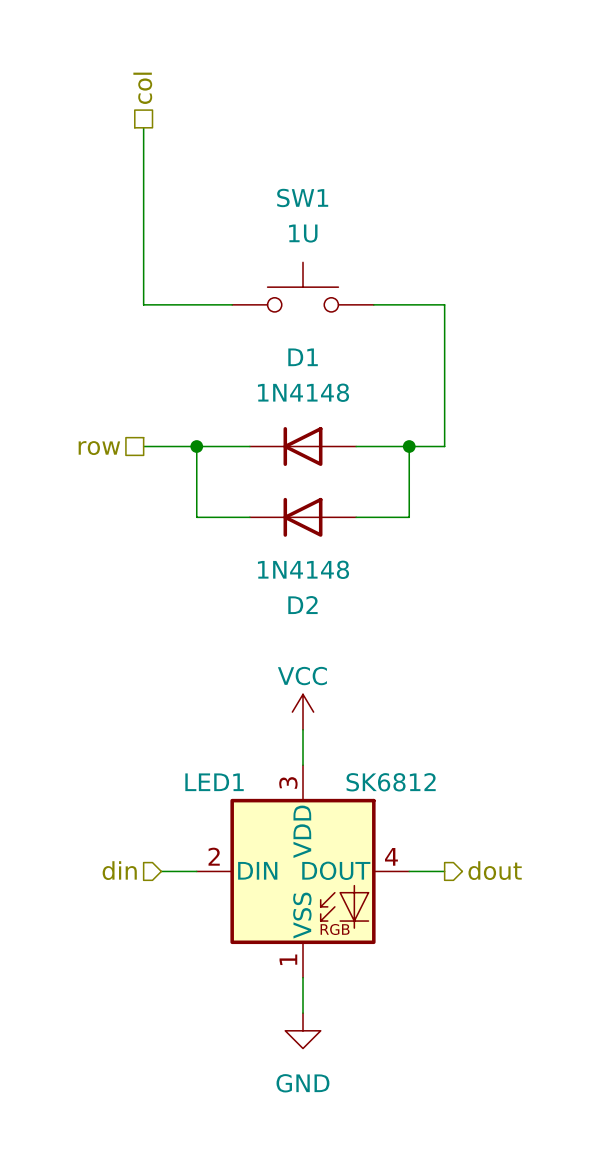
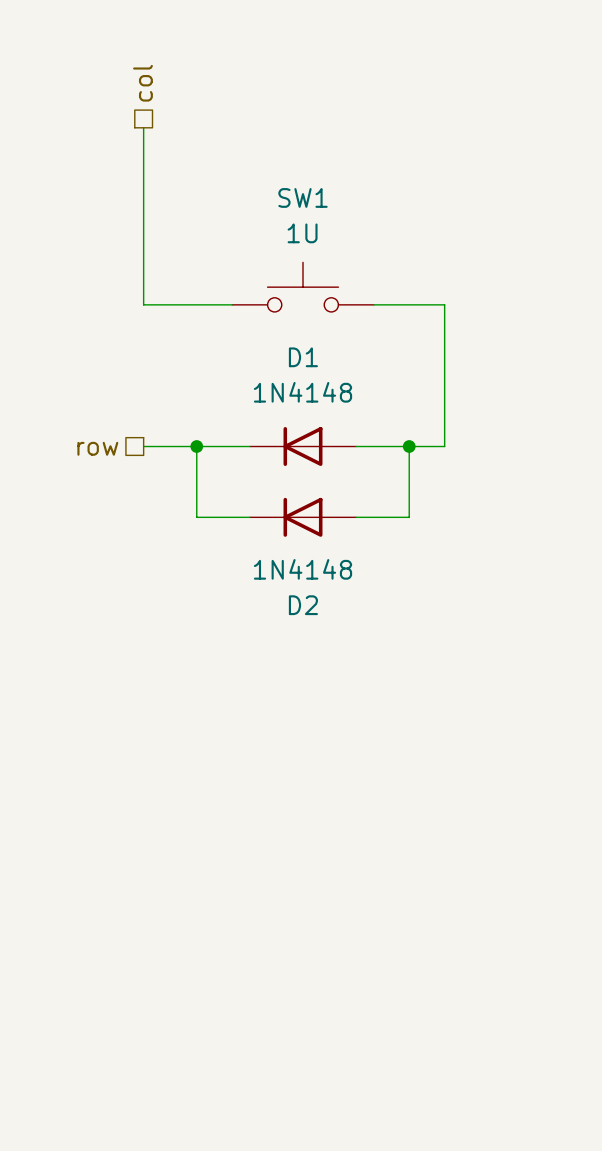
power symbol: VCC (303, 712) -> none
wire: (303, 729) (303, 765) -> none
hierarchical label: din (119, 870) -> none
hierarchical label: dout (495, 870) -> none
wire: (161, 871) (196, 871) -> none
LED1: SK6812 (303, 871) -> none
wire: (409, 871) (444, 871) -> none
wire: (303, 977) (303, 1013) -> none
power symbol: GND (303, 1030) -> none

